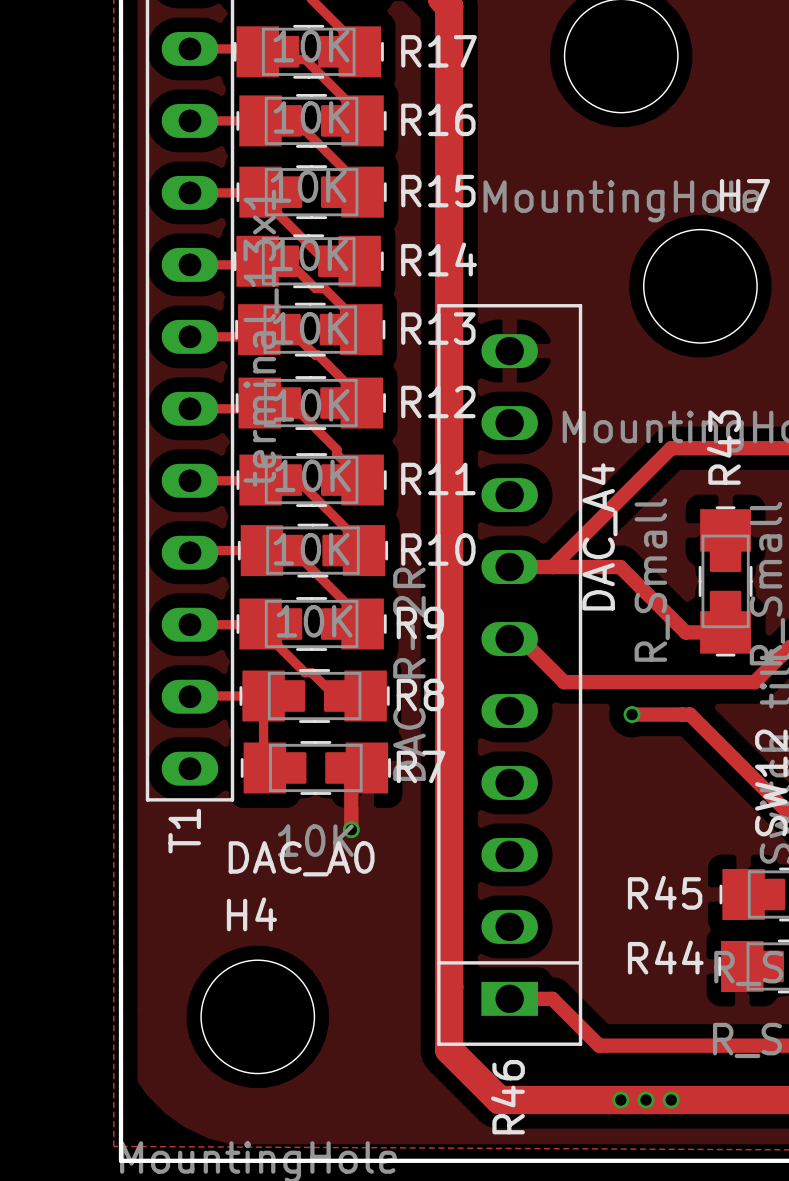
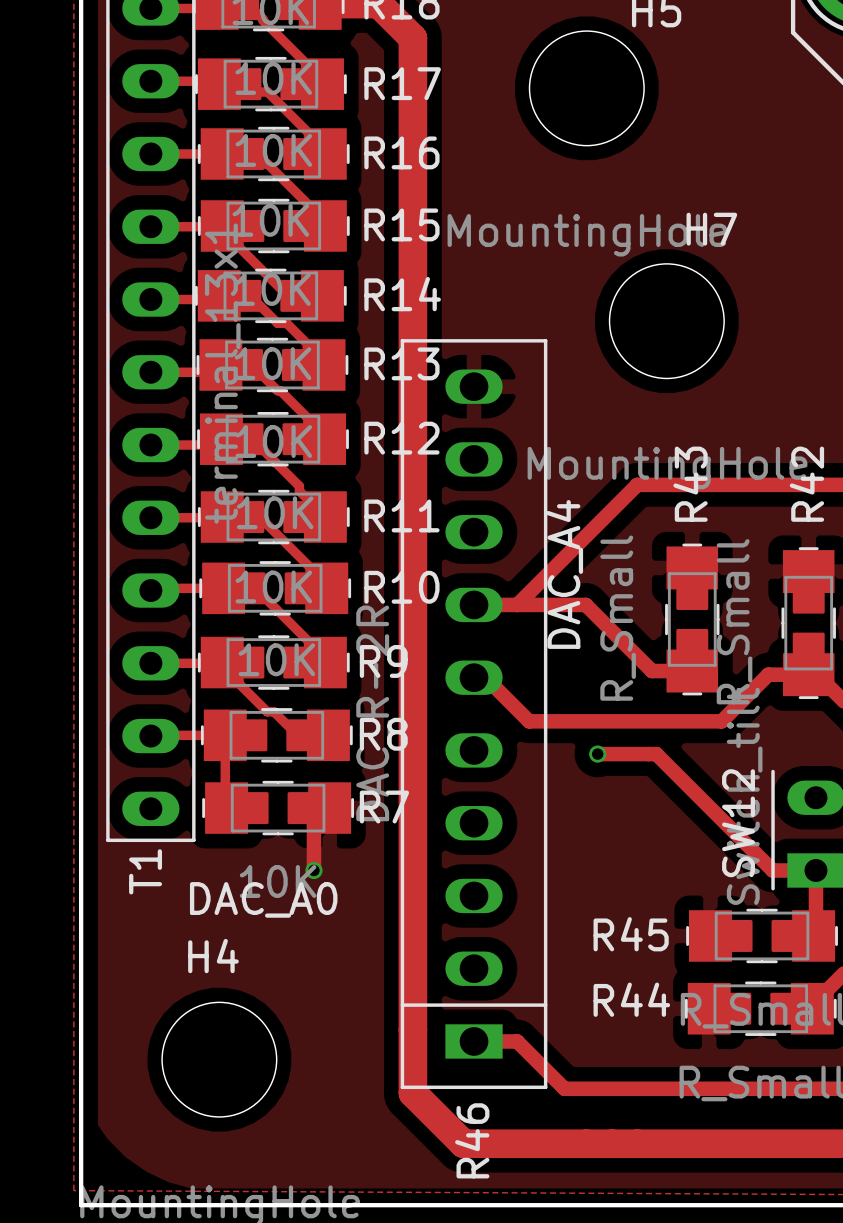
via: (620, 1100) -> none
via: (646, 1100) -> none
via: (671, 1100) -> none

